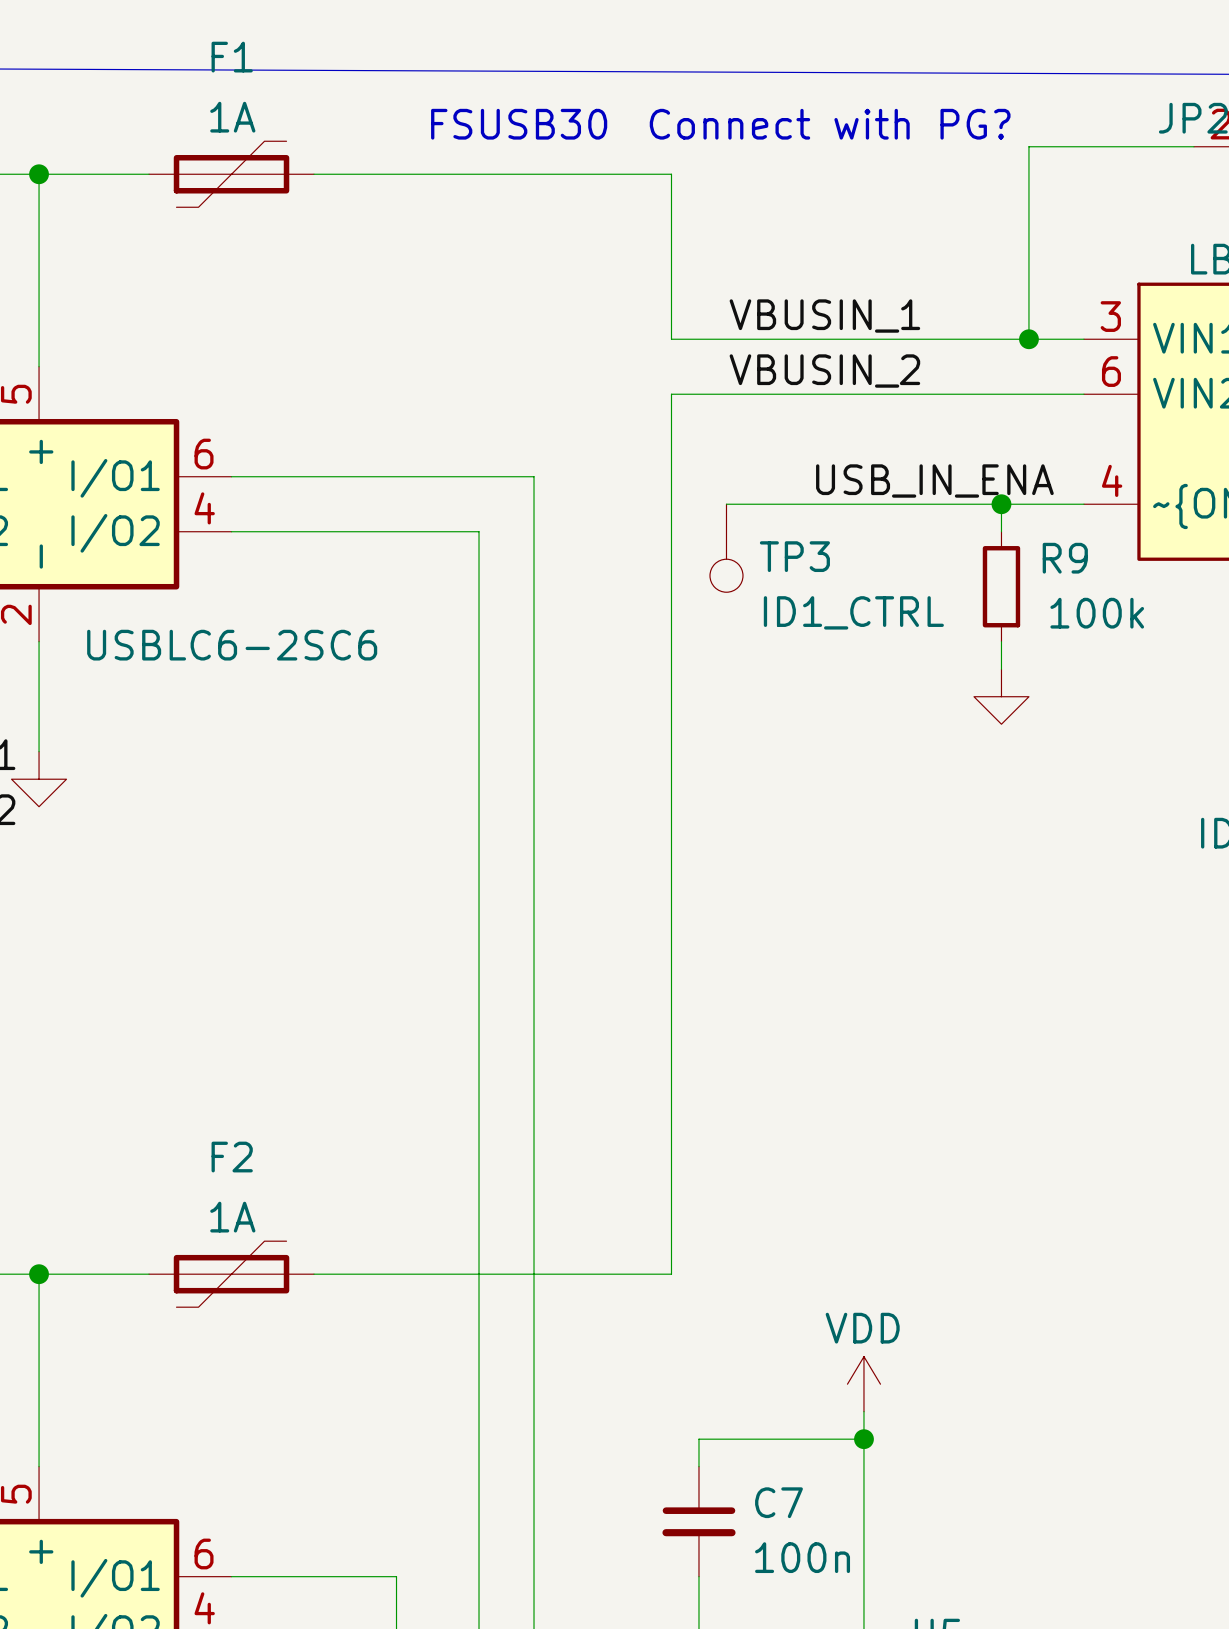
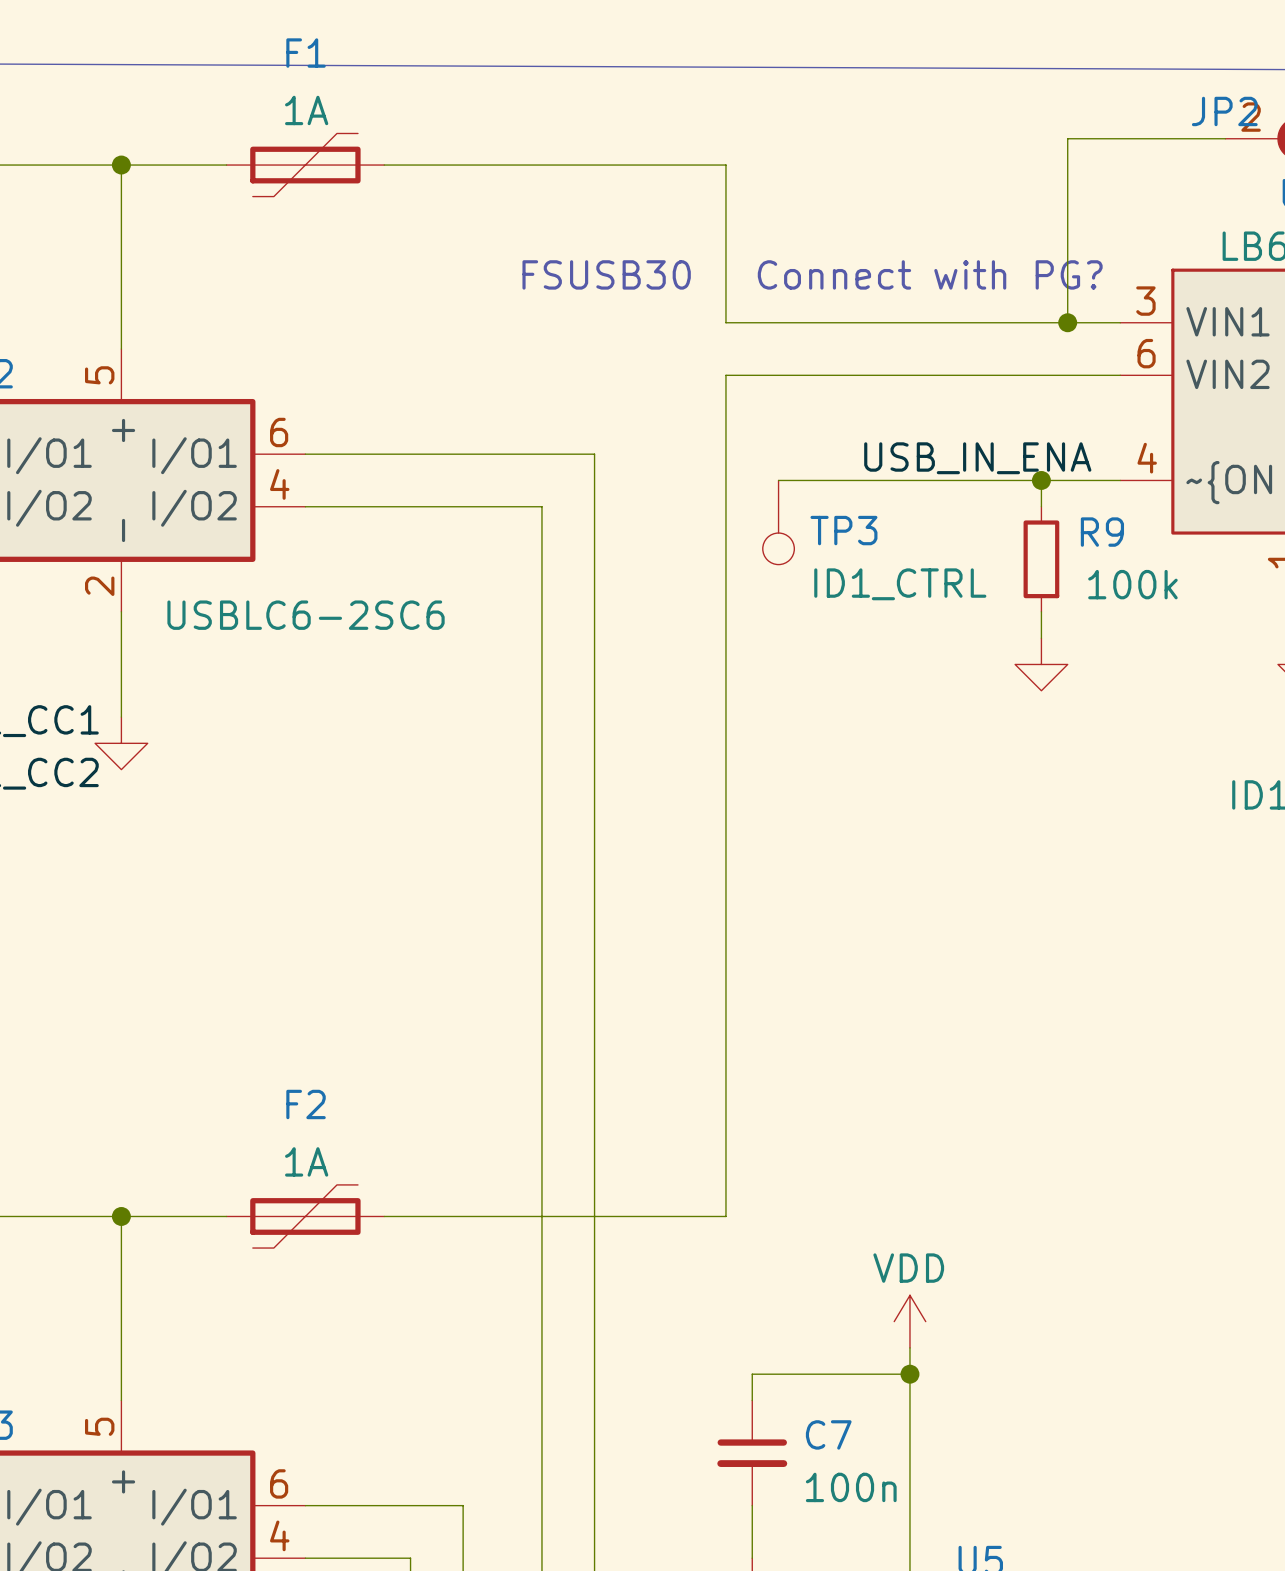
text position: FSUSB30 (519, 124) -> FSUSB30 (606, 274)
text position: Connect with PG? (830, 124) -> Connect with PG? (930, 274)
label: VBUSIN_1 (824, 316) -> none
label: VBUSIN_2 (824, 371) -> none

